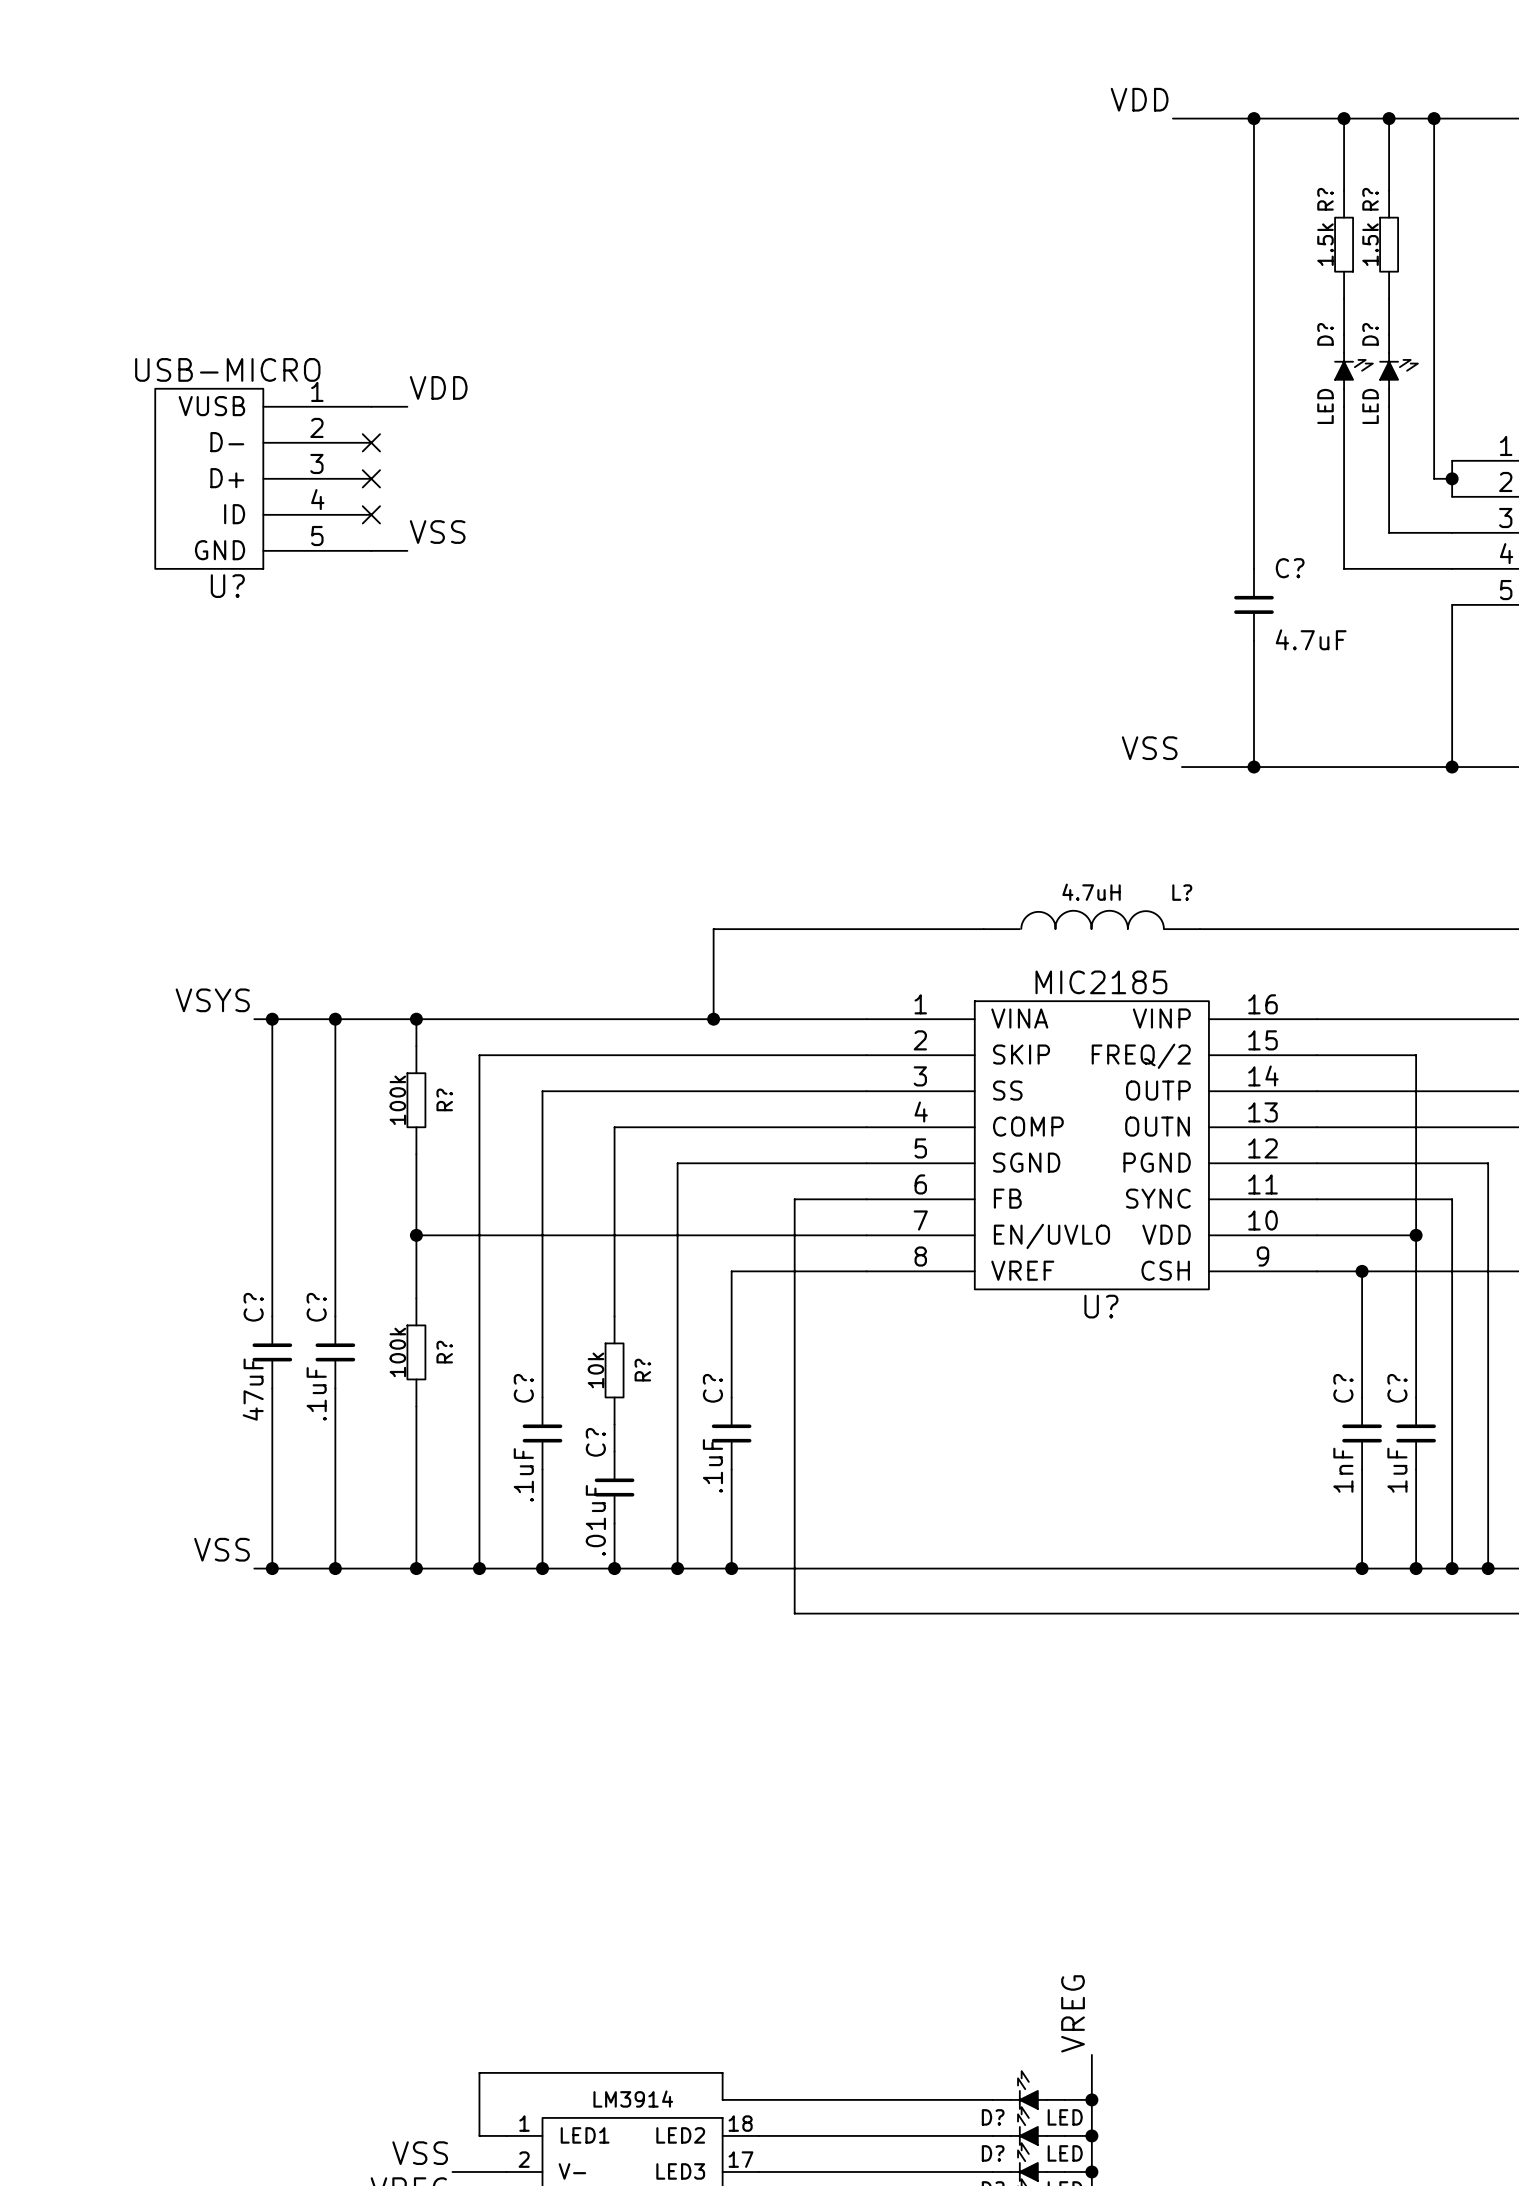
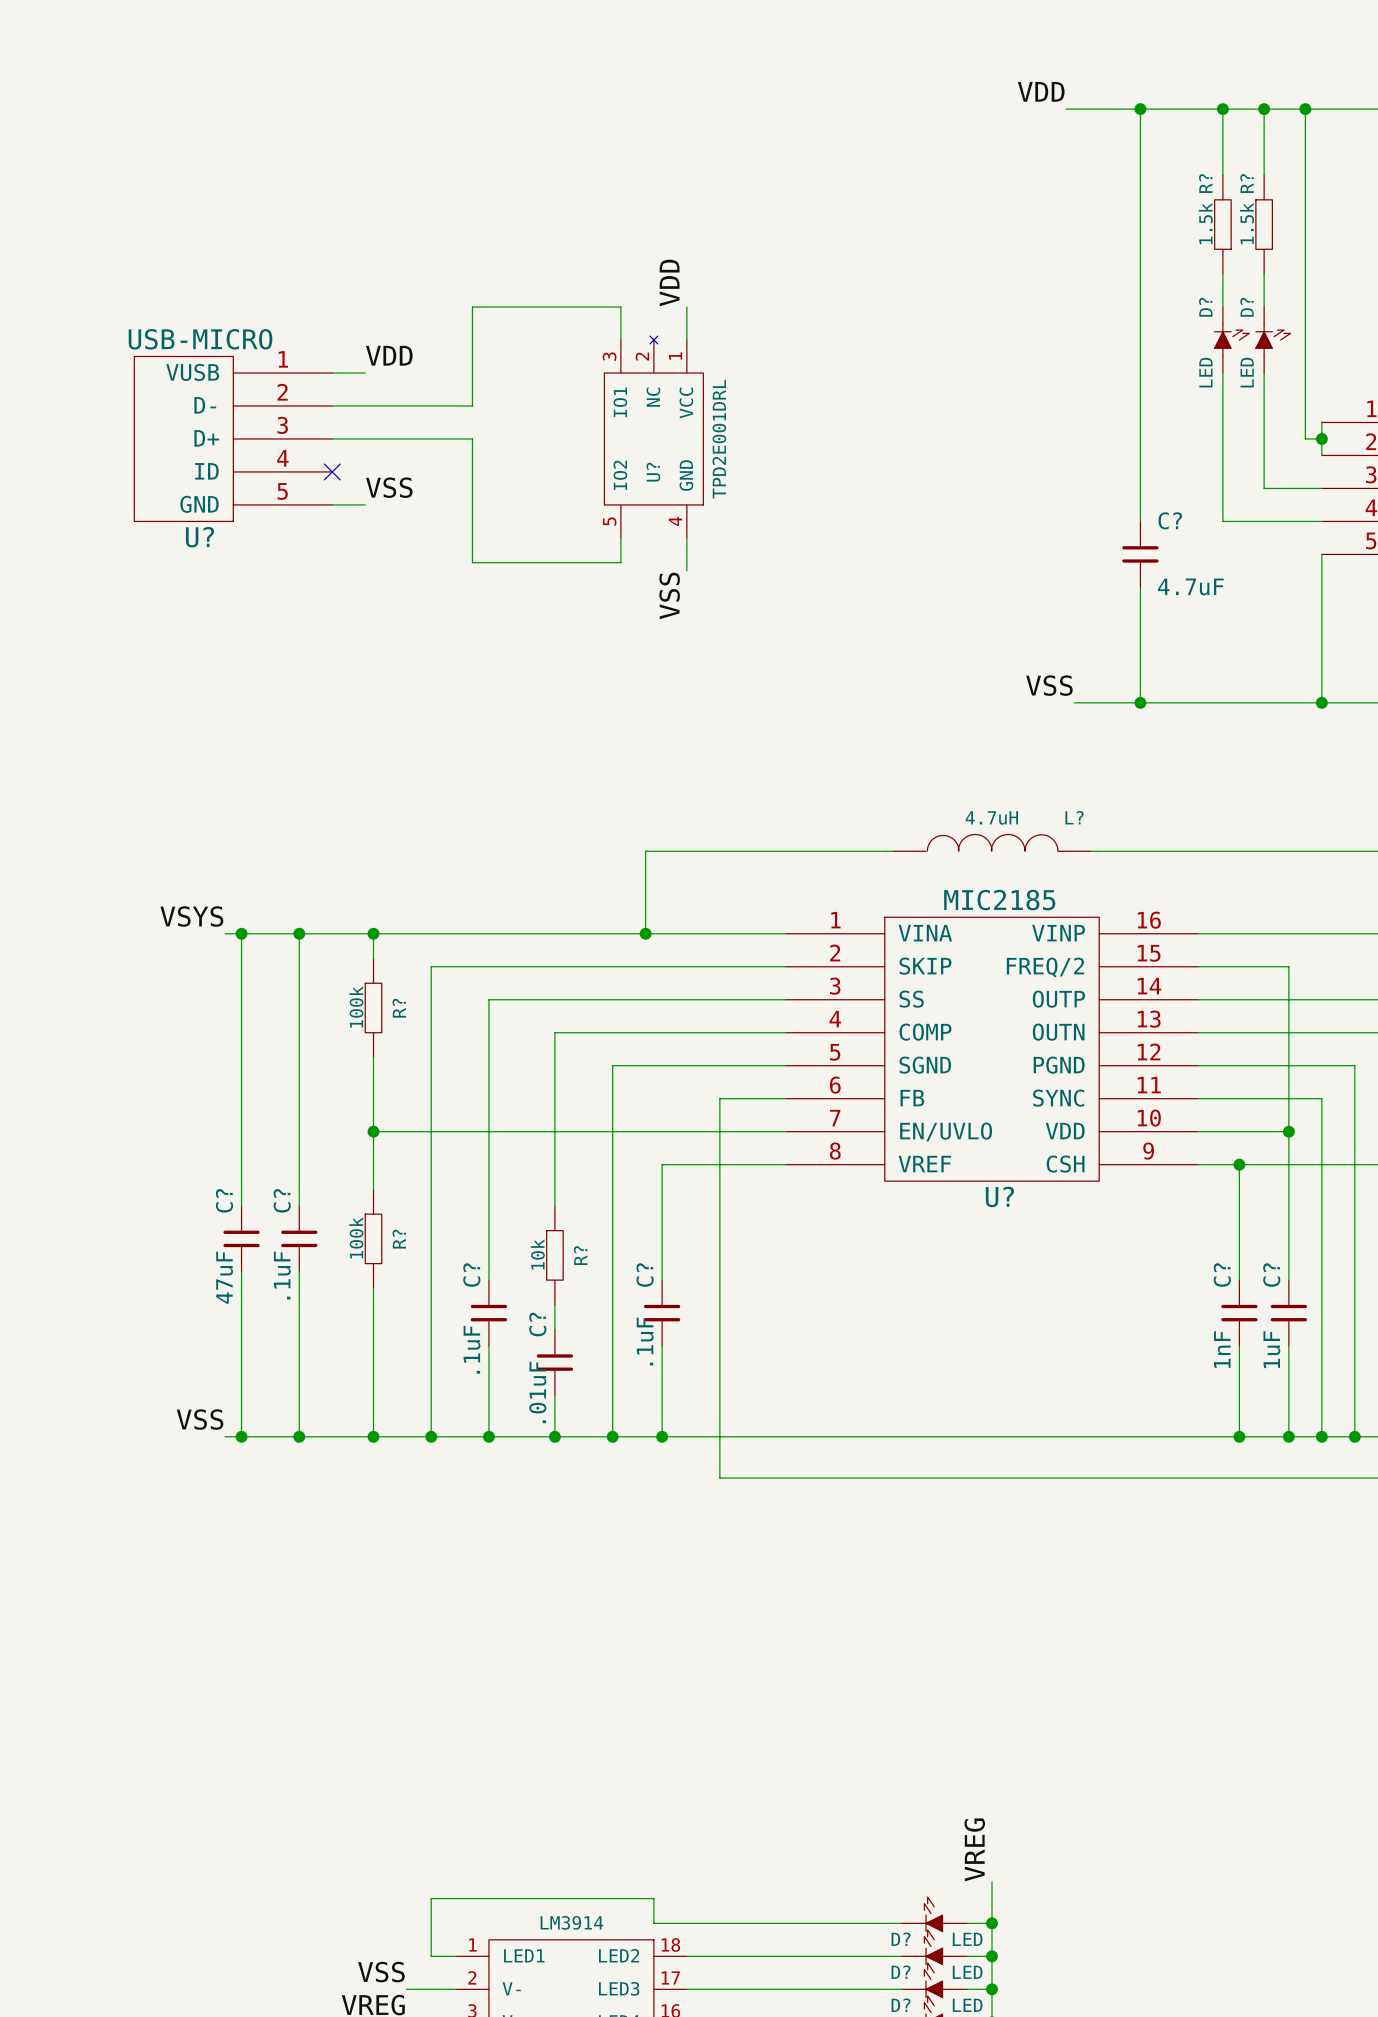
label: none -> VDD (669, 282)
wire: none -> (686, 307) (686, 340)
wire: none -> (620, 340) (620, 307) (472, 307) (472, 405) (332, 405)
no-connect mark: (371, 442) -> none
U?: none -> TPD2E001DRL (653, 437)
wire: none -> (332, 438) (472, 438) (472, 562) (620, 562) (620, 537)
no-connect mark: (371, 478) -> none
wire: none -> (686, 537) (686, 570)
label: none -> VSS (669, 595)

